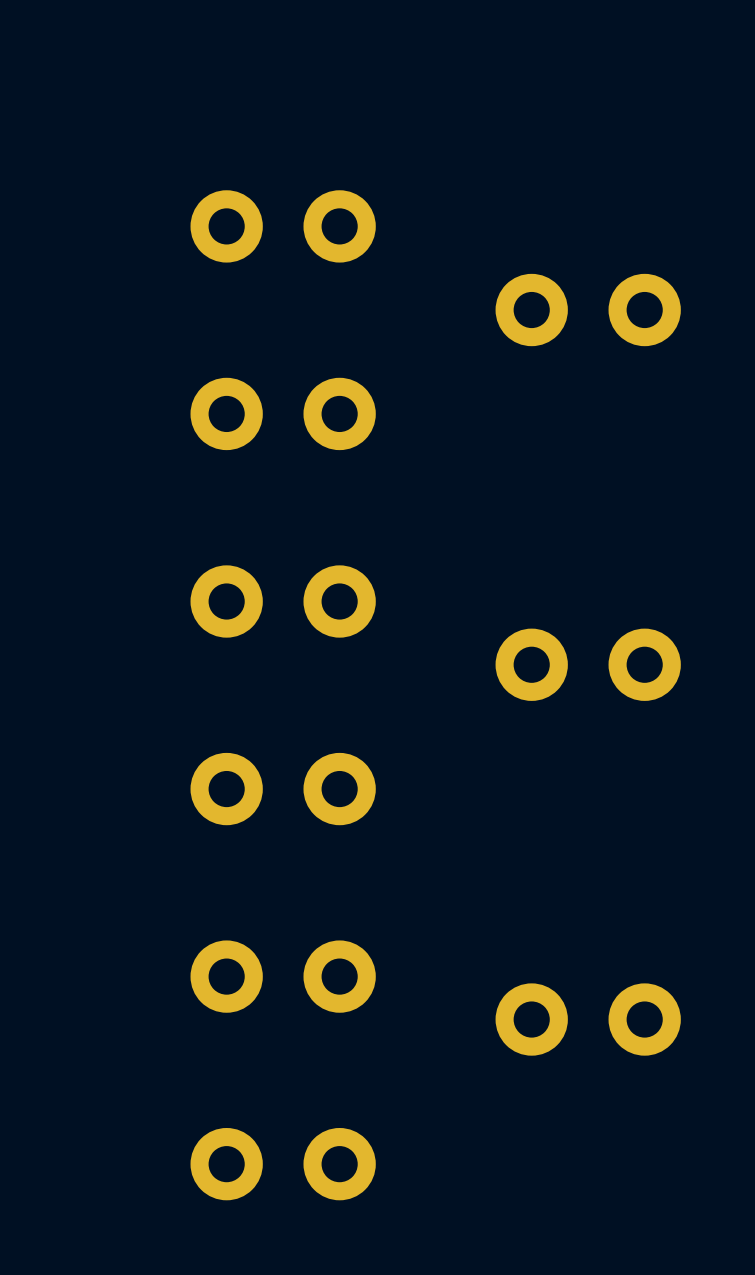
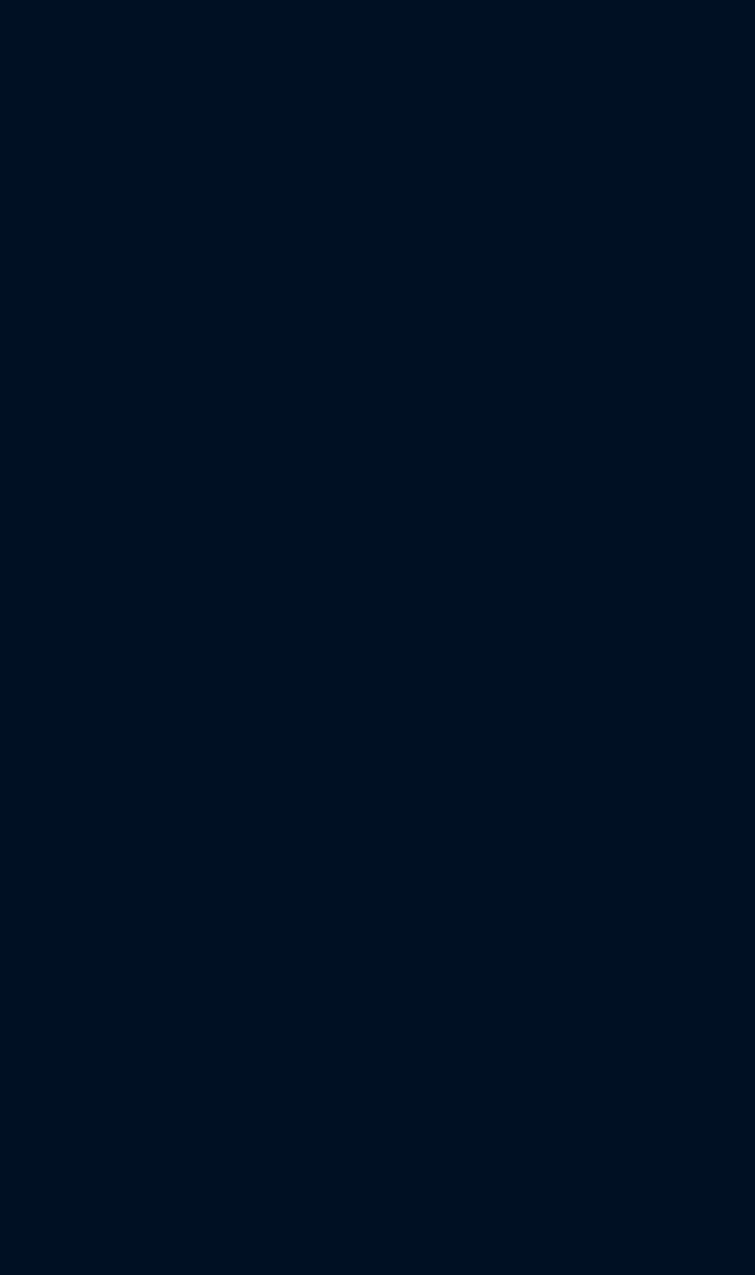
part: (283, 226) -> none
part: (588, 310) -> none
part: (283, 413) -> none
part: (283, 601) -> none
part: (588, 664) -> none
part: (283, 789) -> none
part: (283, 976) -> none
part: (588, 1019) -> none
part: (283, 1164) -> none

